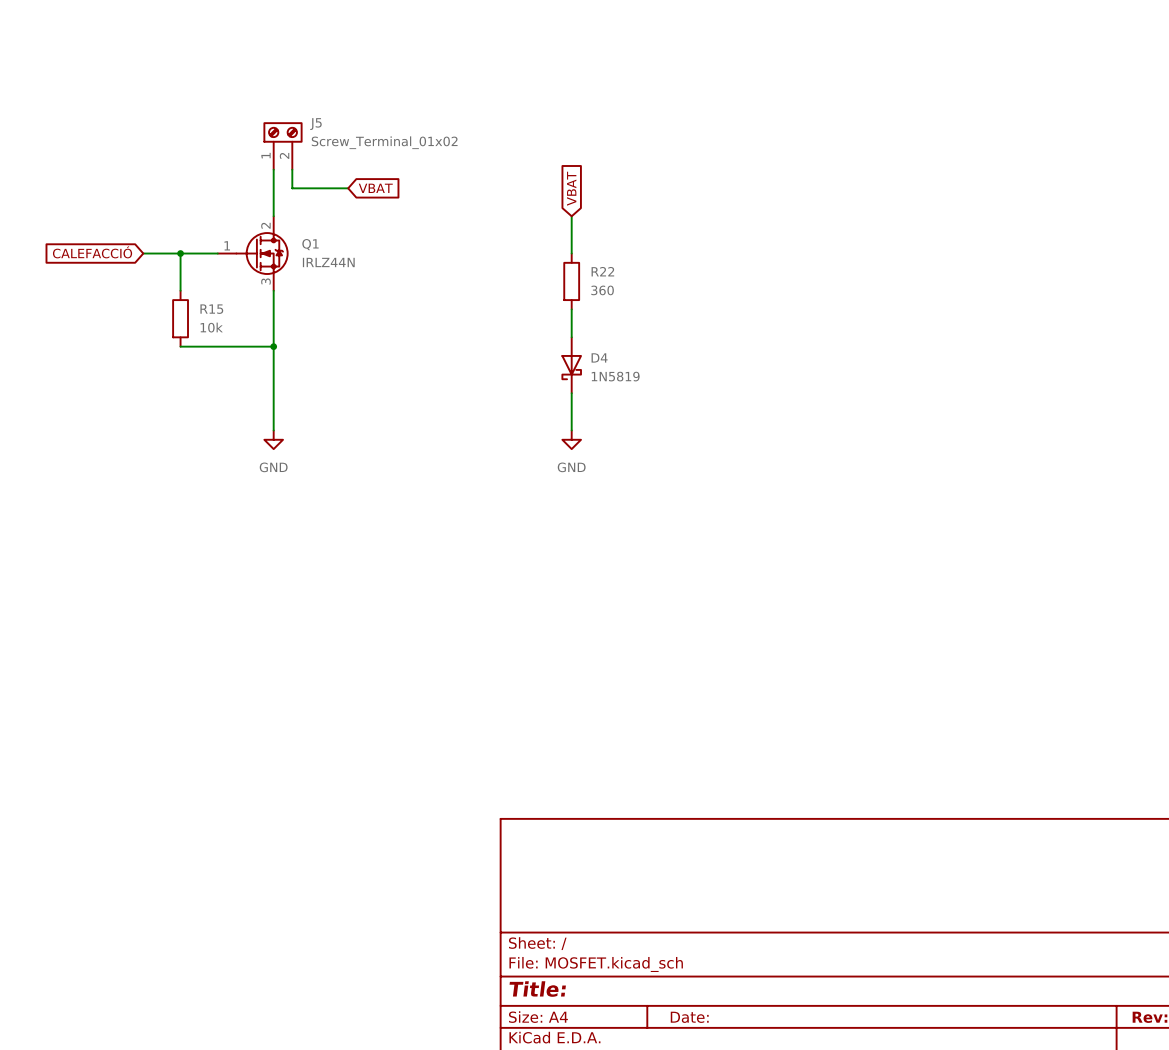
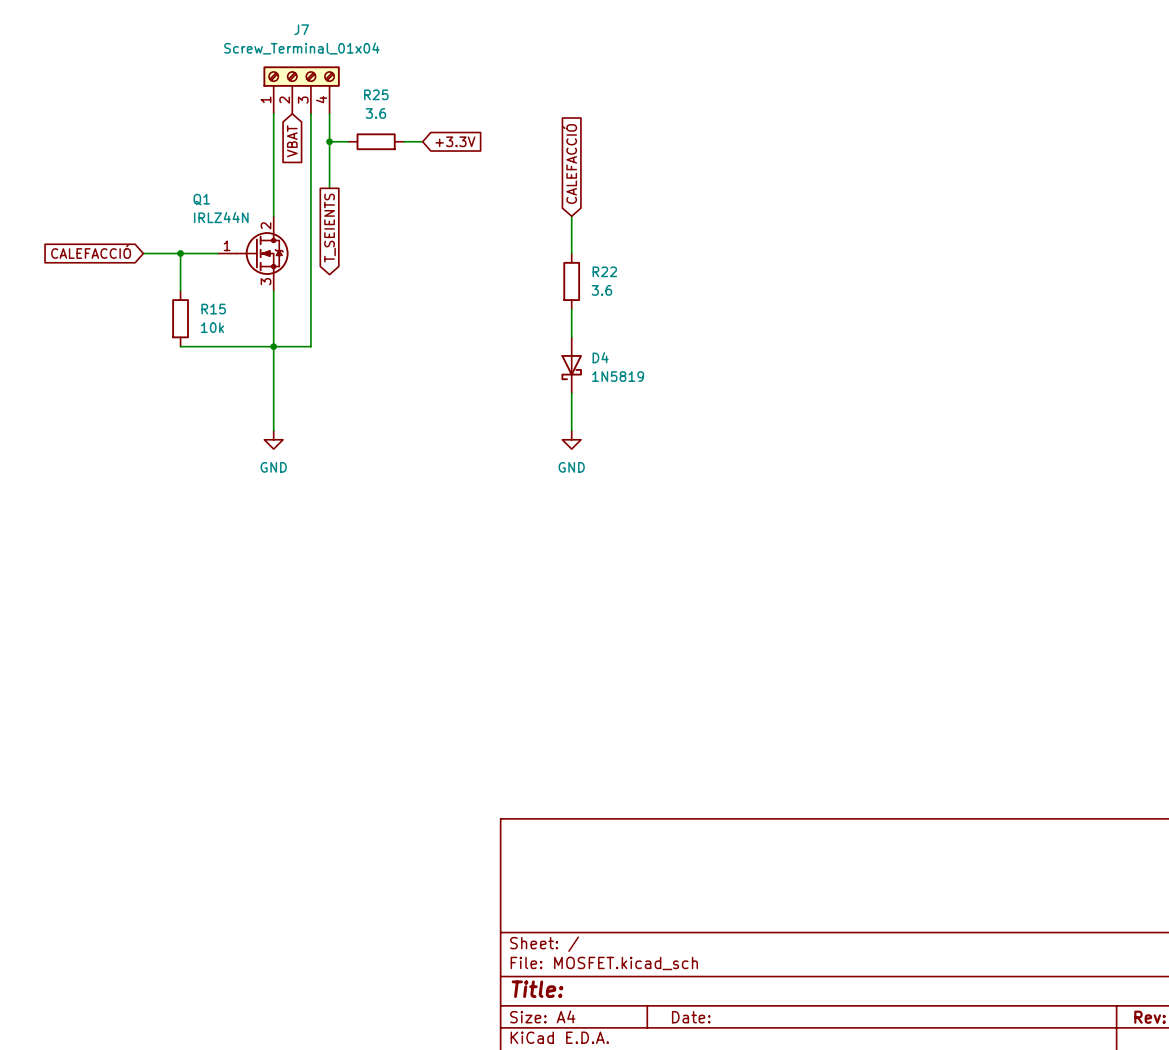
J7: none -> Screw_Terminal_01x04 (301, 90)
wire: none -> (310, 113) (310, 346) (273, 346)
wire: none -> (329, 113) (329, 188)
junction: none -> (329, 141)
R25: none -> 3.6 (376, 141)
wire: none -> (404, 141) (422, 141)
global label: none -> +3.3V (455, 141)
J5: Screw_Terminal_01x02 (282, 145) -> none
wire: (292, 169) (292, 188) (348, 188) -> none
global label rotation: 0° (375, 188) -> 90° clockwise (292, 141)
global label position: VBAT (375, 188) -> VBAT (292, 141)
global label: VBAT (571, 188) -> CALEFACCIÓ (569, 164)
global label: none -> T_SEIENTS (330, 228)
Q1 name position: Q1 (310, 244) -> Q1 (201, 199)
Q1 value position: IRLZ44N (328, 262) -> IRLZ44N (221, 217)
R22 value: 360 (602, 290) -> 3.6 (601, 290)

